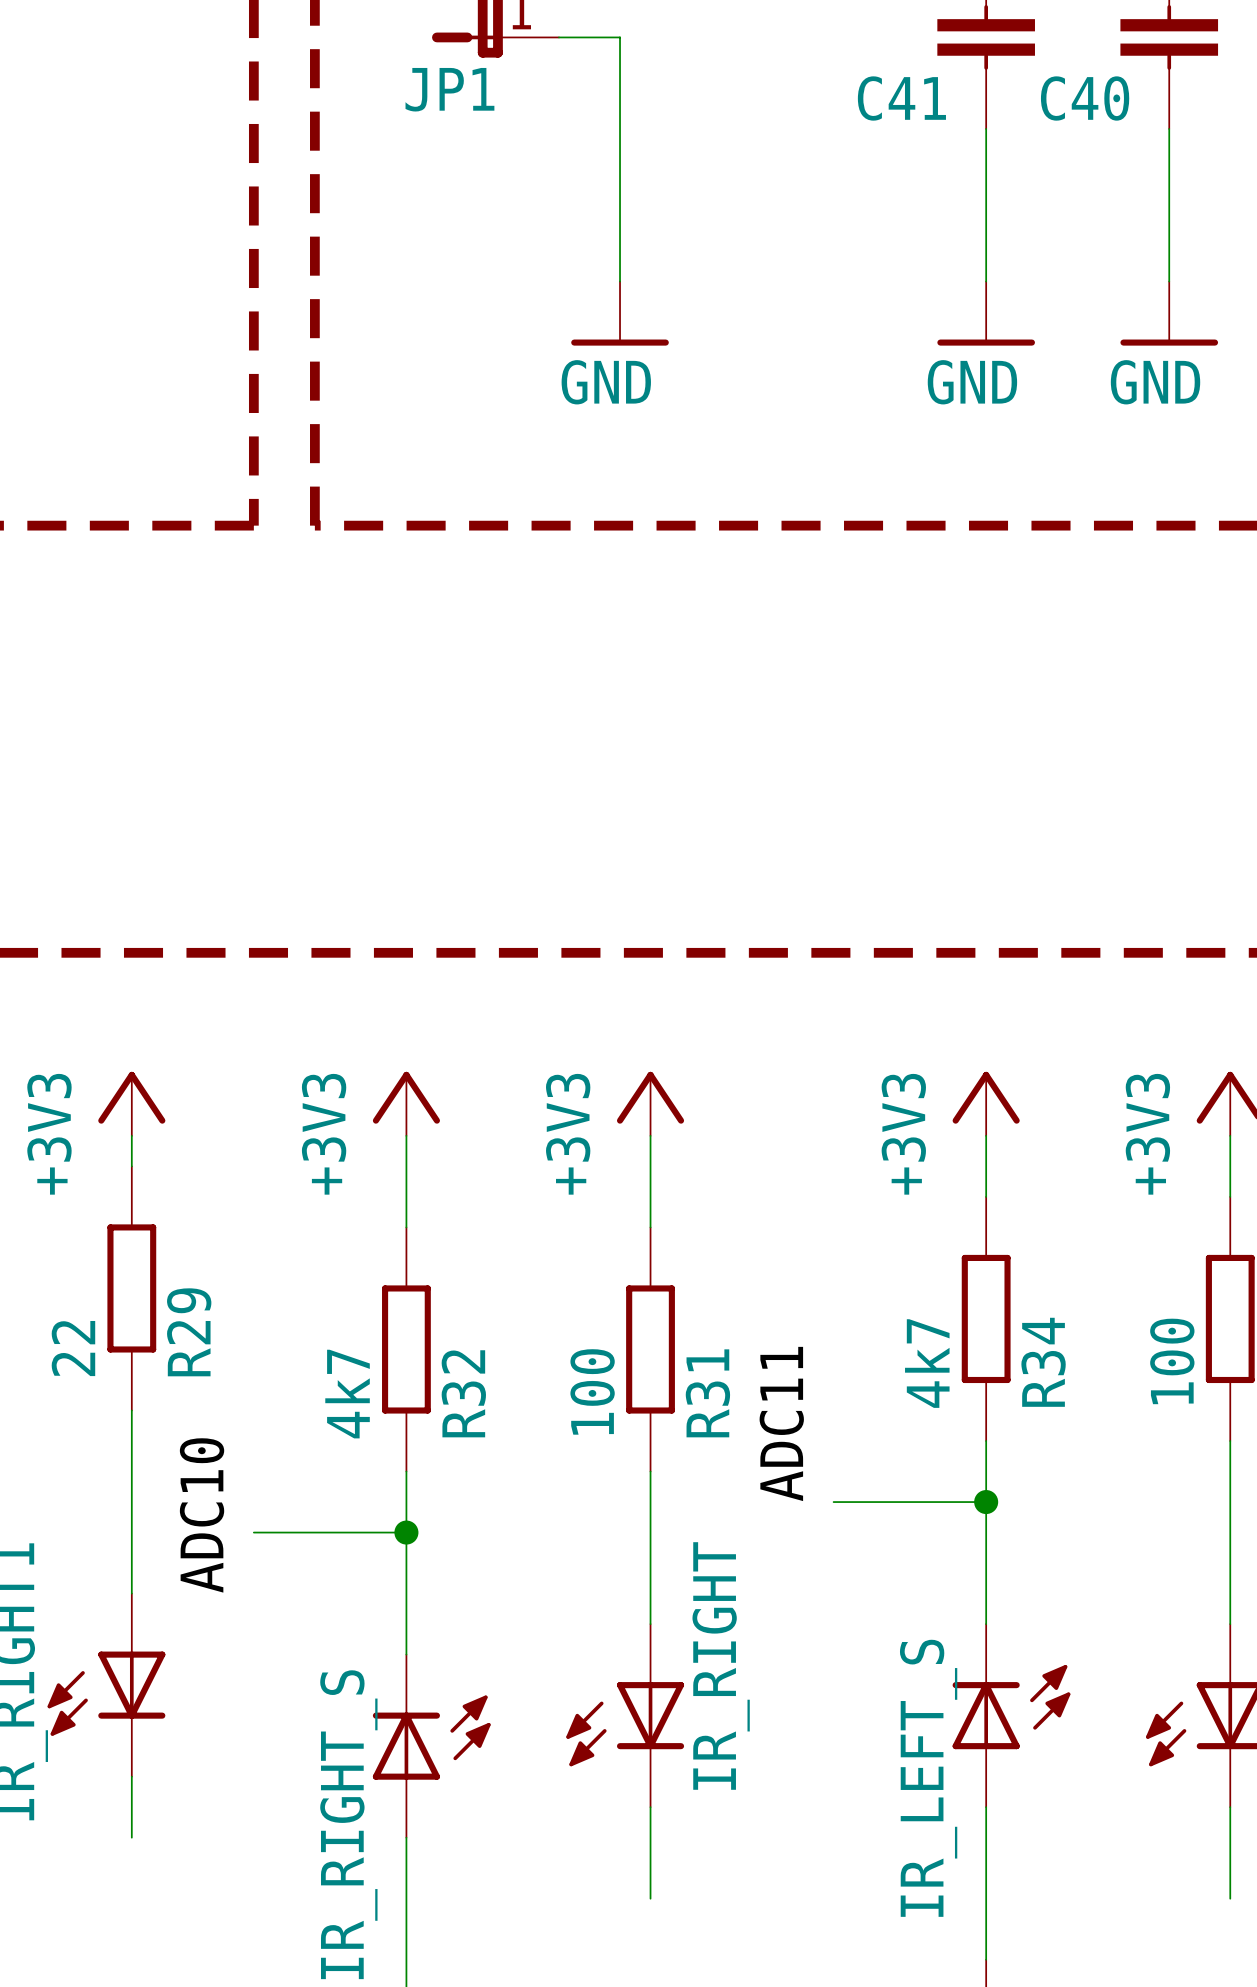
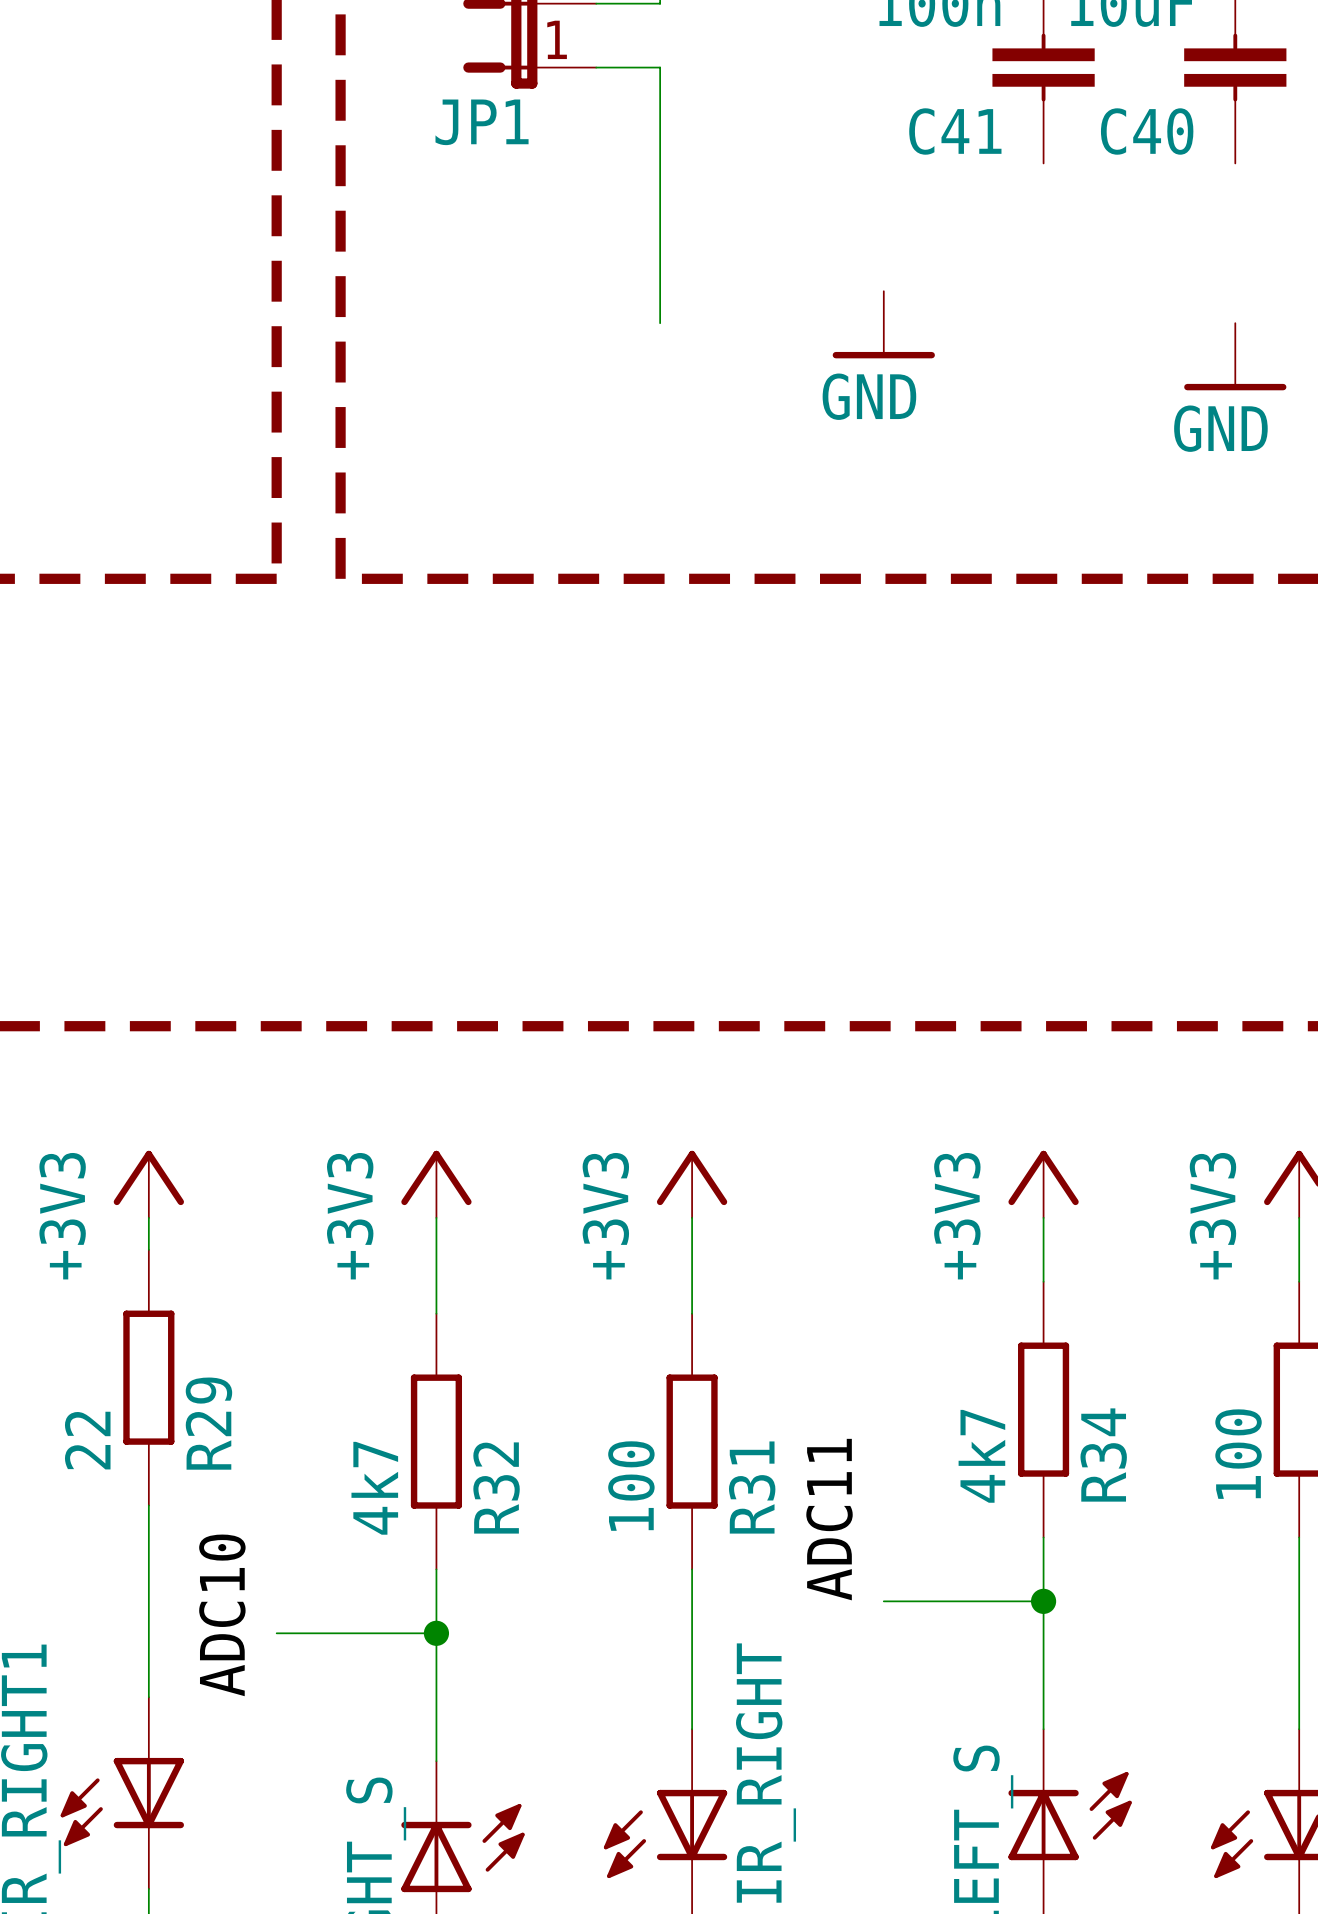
wire: (986, 128) (986, 281) -> none
wire: (1169, 128) (1169, 281) -> none
power symbol: none -> GND (883, 324)
power symbol: GND (620, 313) -> none
power symbol: GND (986, 313) -> none

